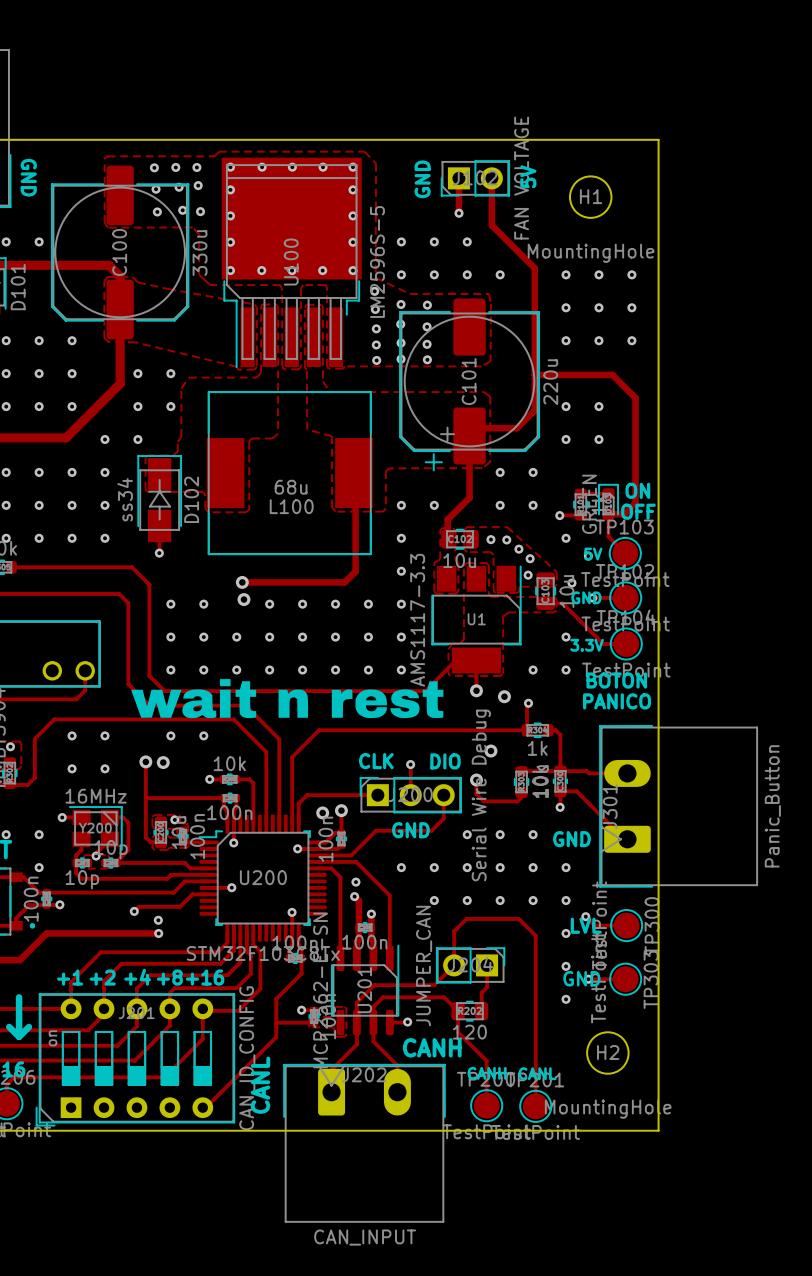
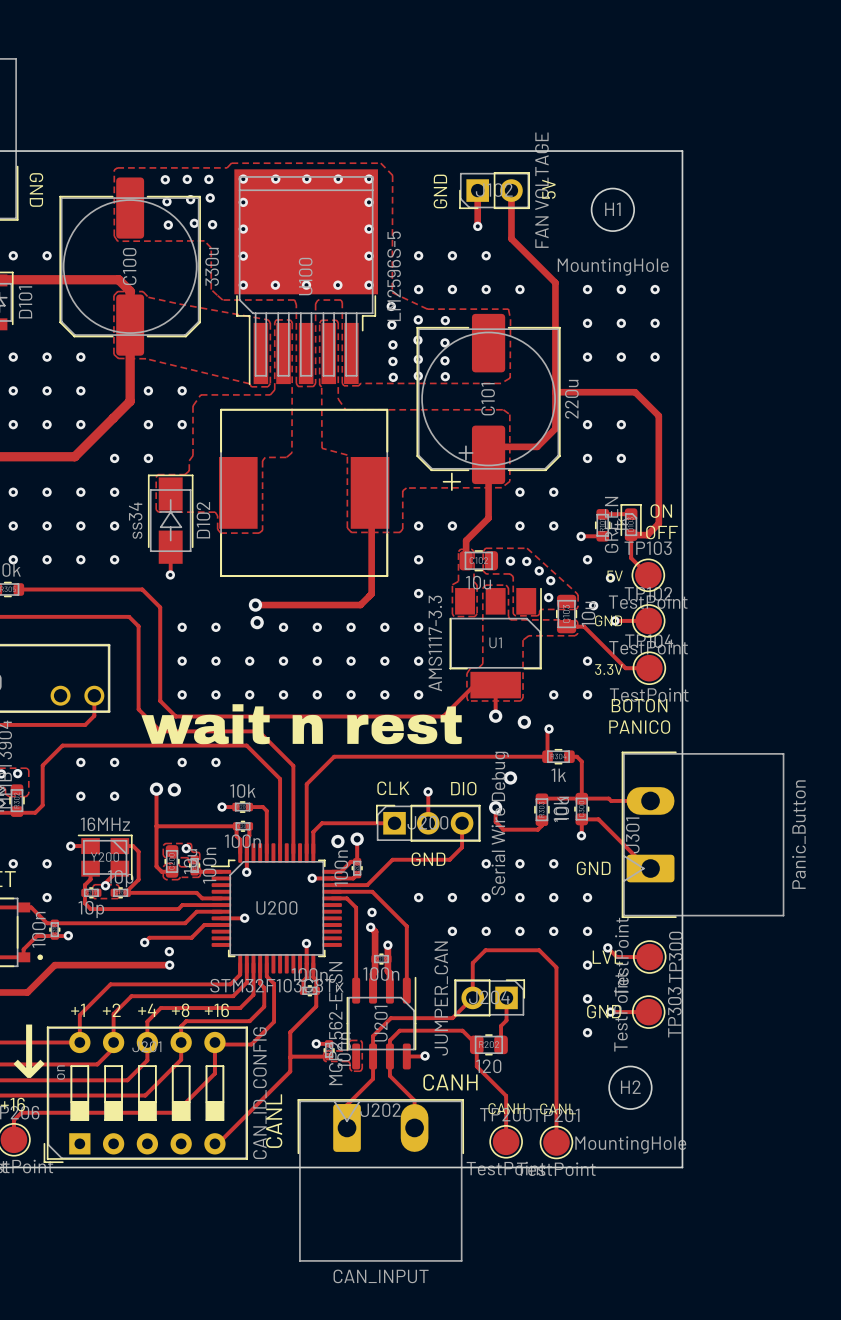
L100 value: 68u (291, 487) -> none
L100 name: L100 (291, 506) -> none

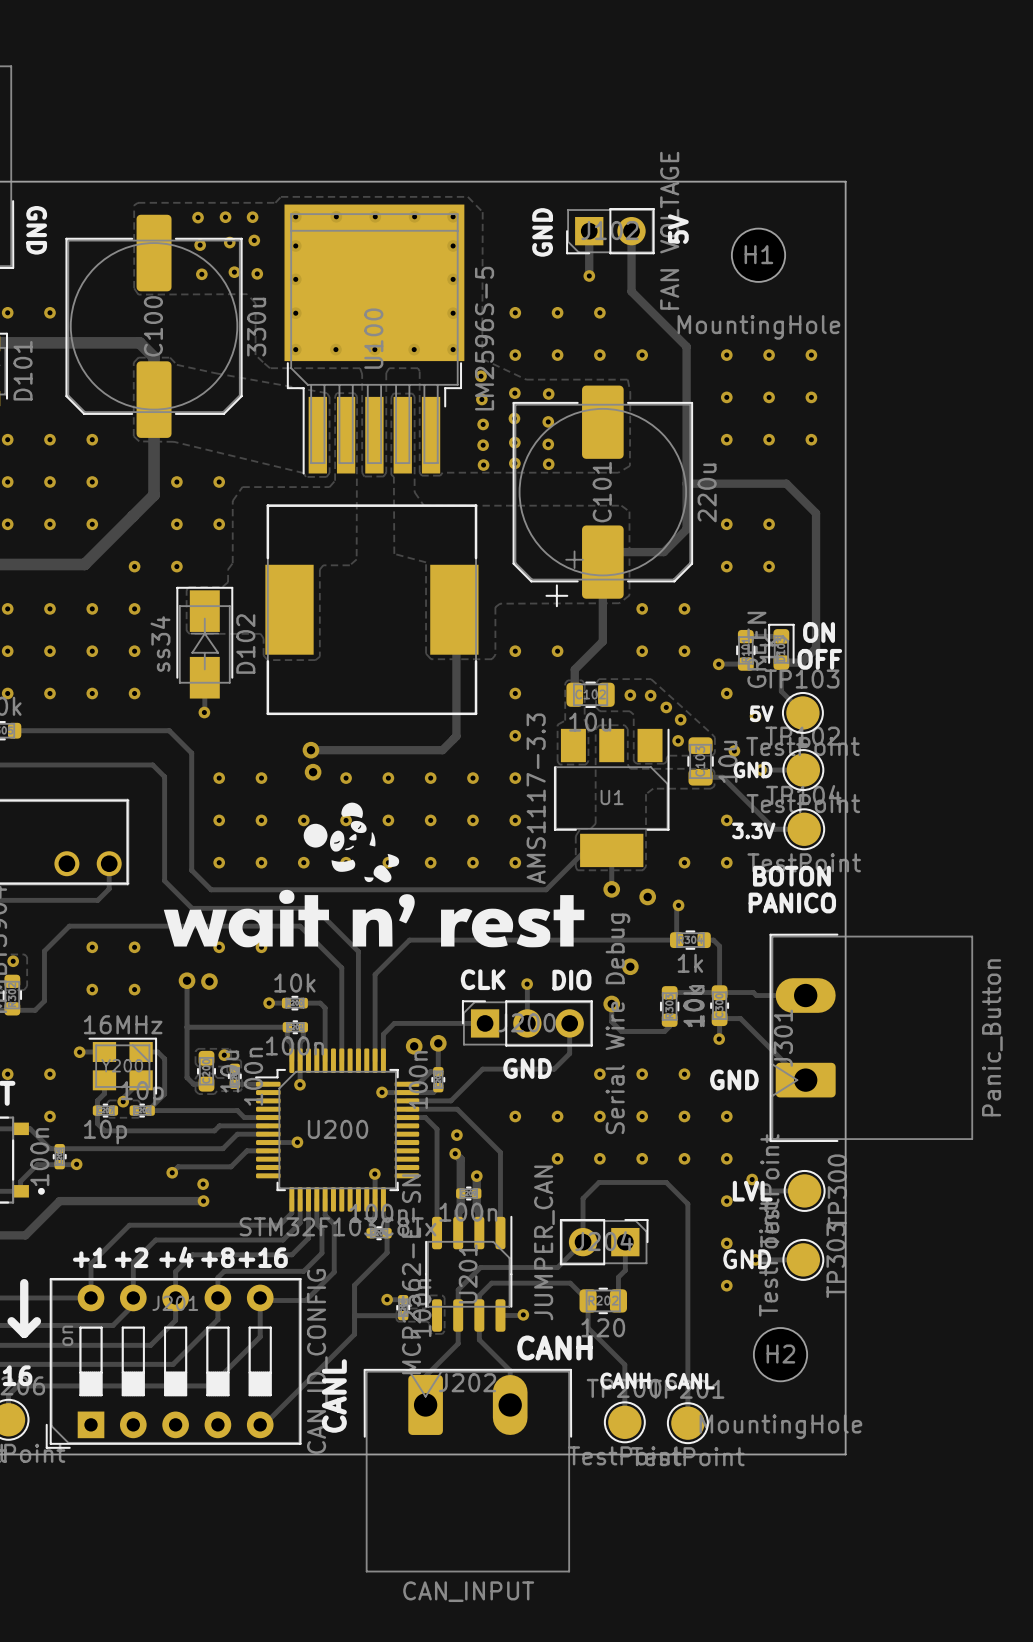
drawing: none -> [163, 802, 585, 948]
drawing: [141, 704, 462, 745] -> none

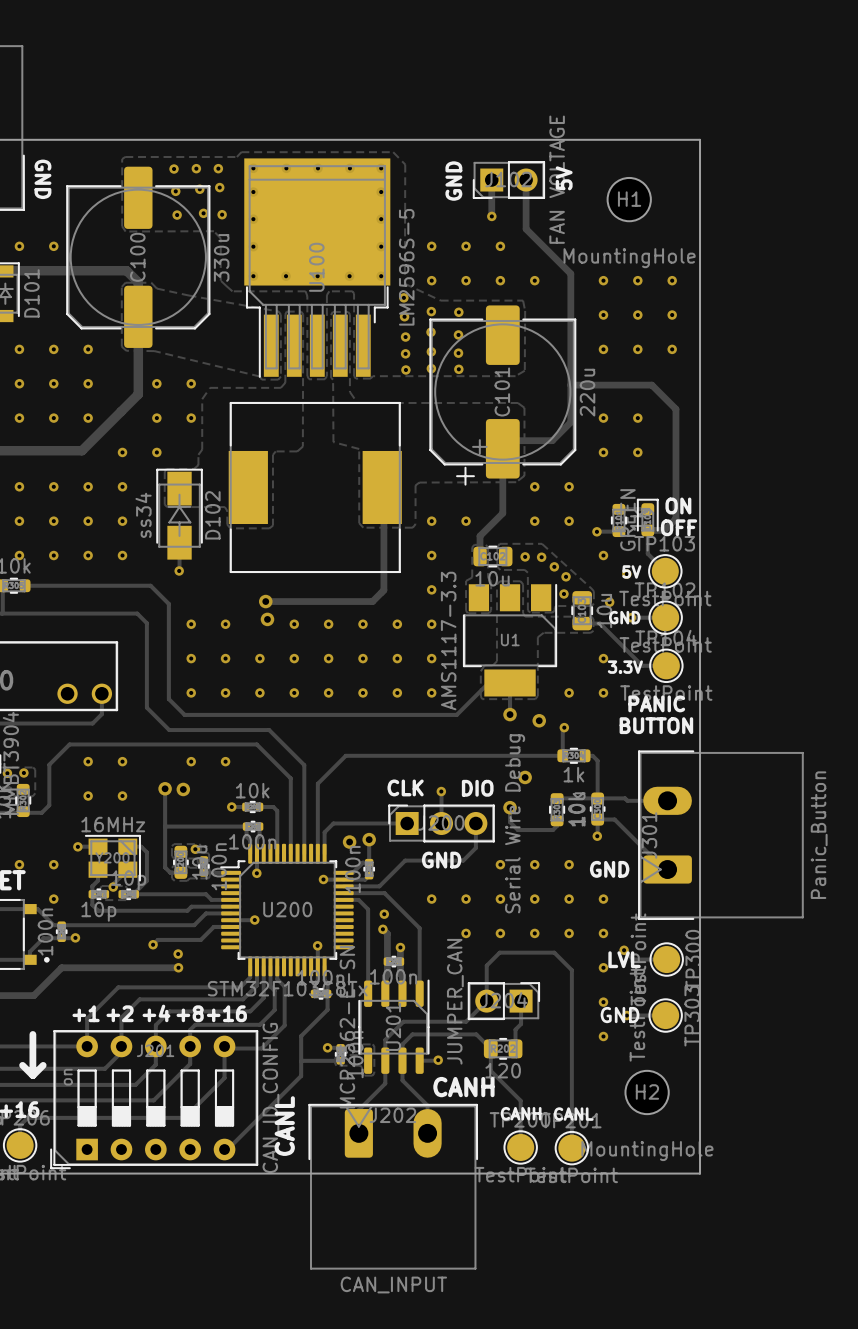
drawing: [163, 802, 585, 948] -> none
text: BOTON (791, 876) -> PANIC (656, 703)
text: PANICO (792, 902) -> BUTTON (656, 725)

